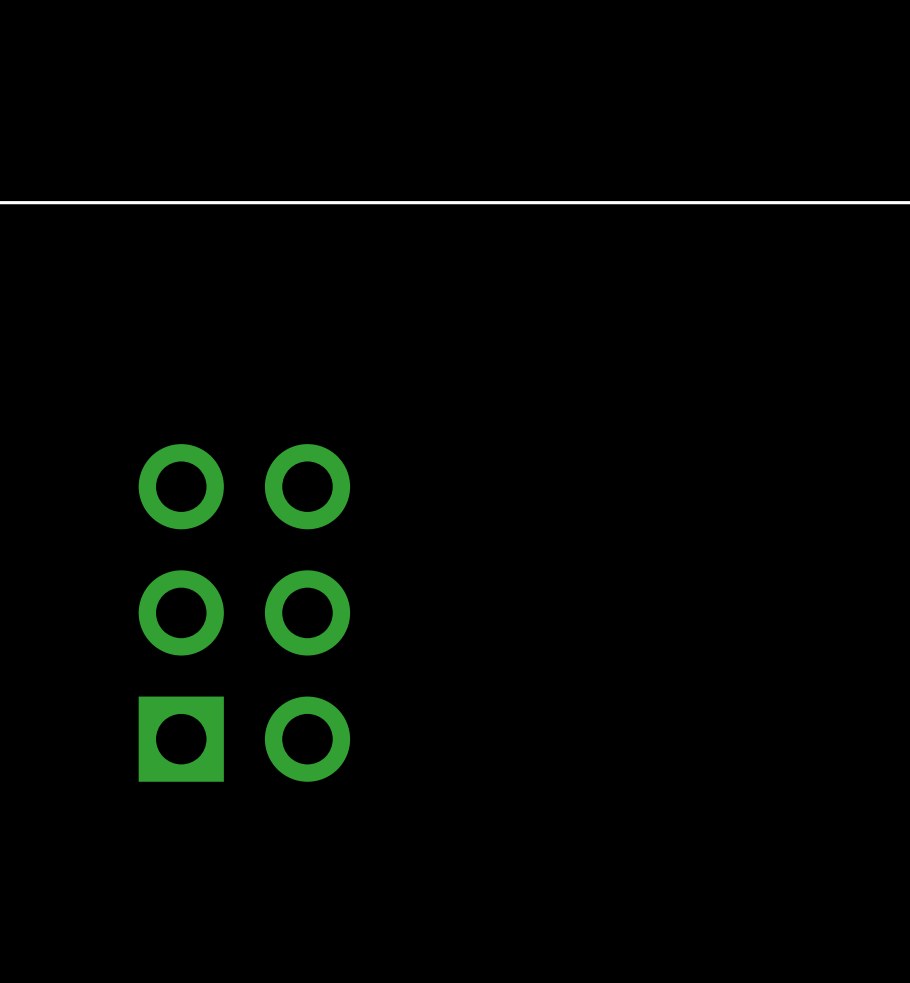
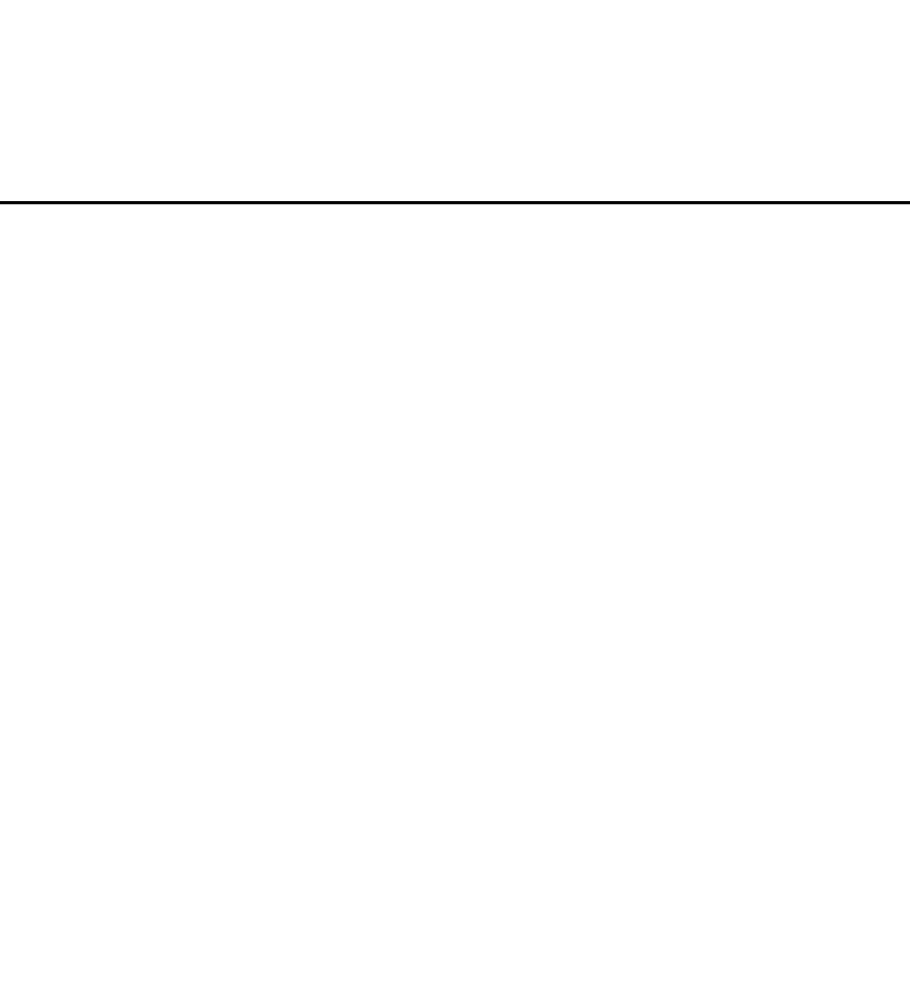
part: (244, 612) -> none

